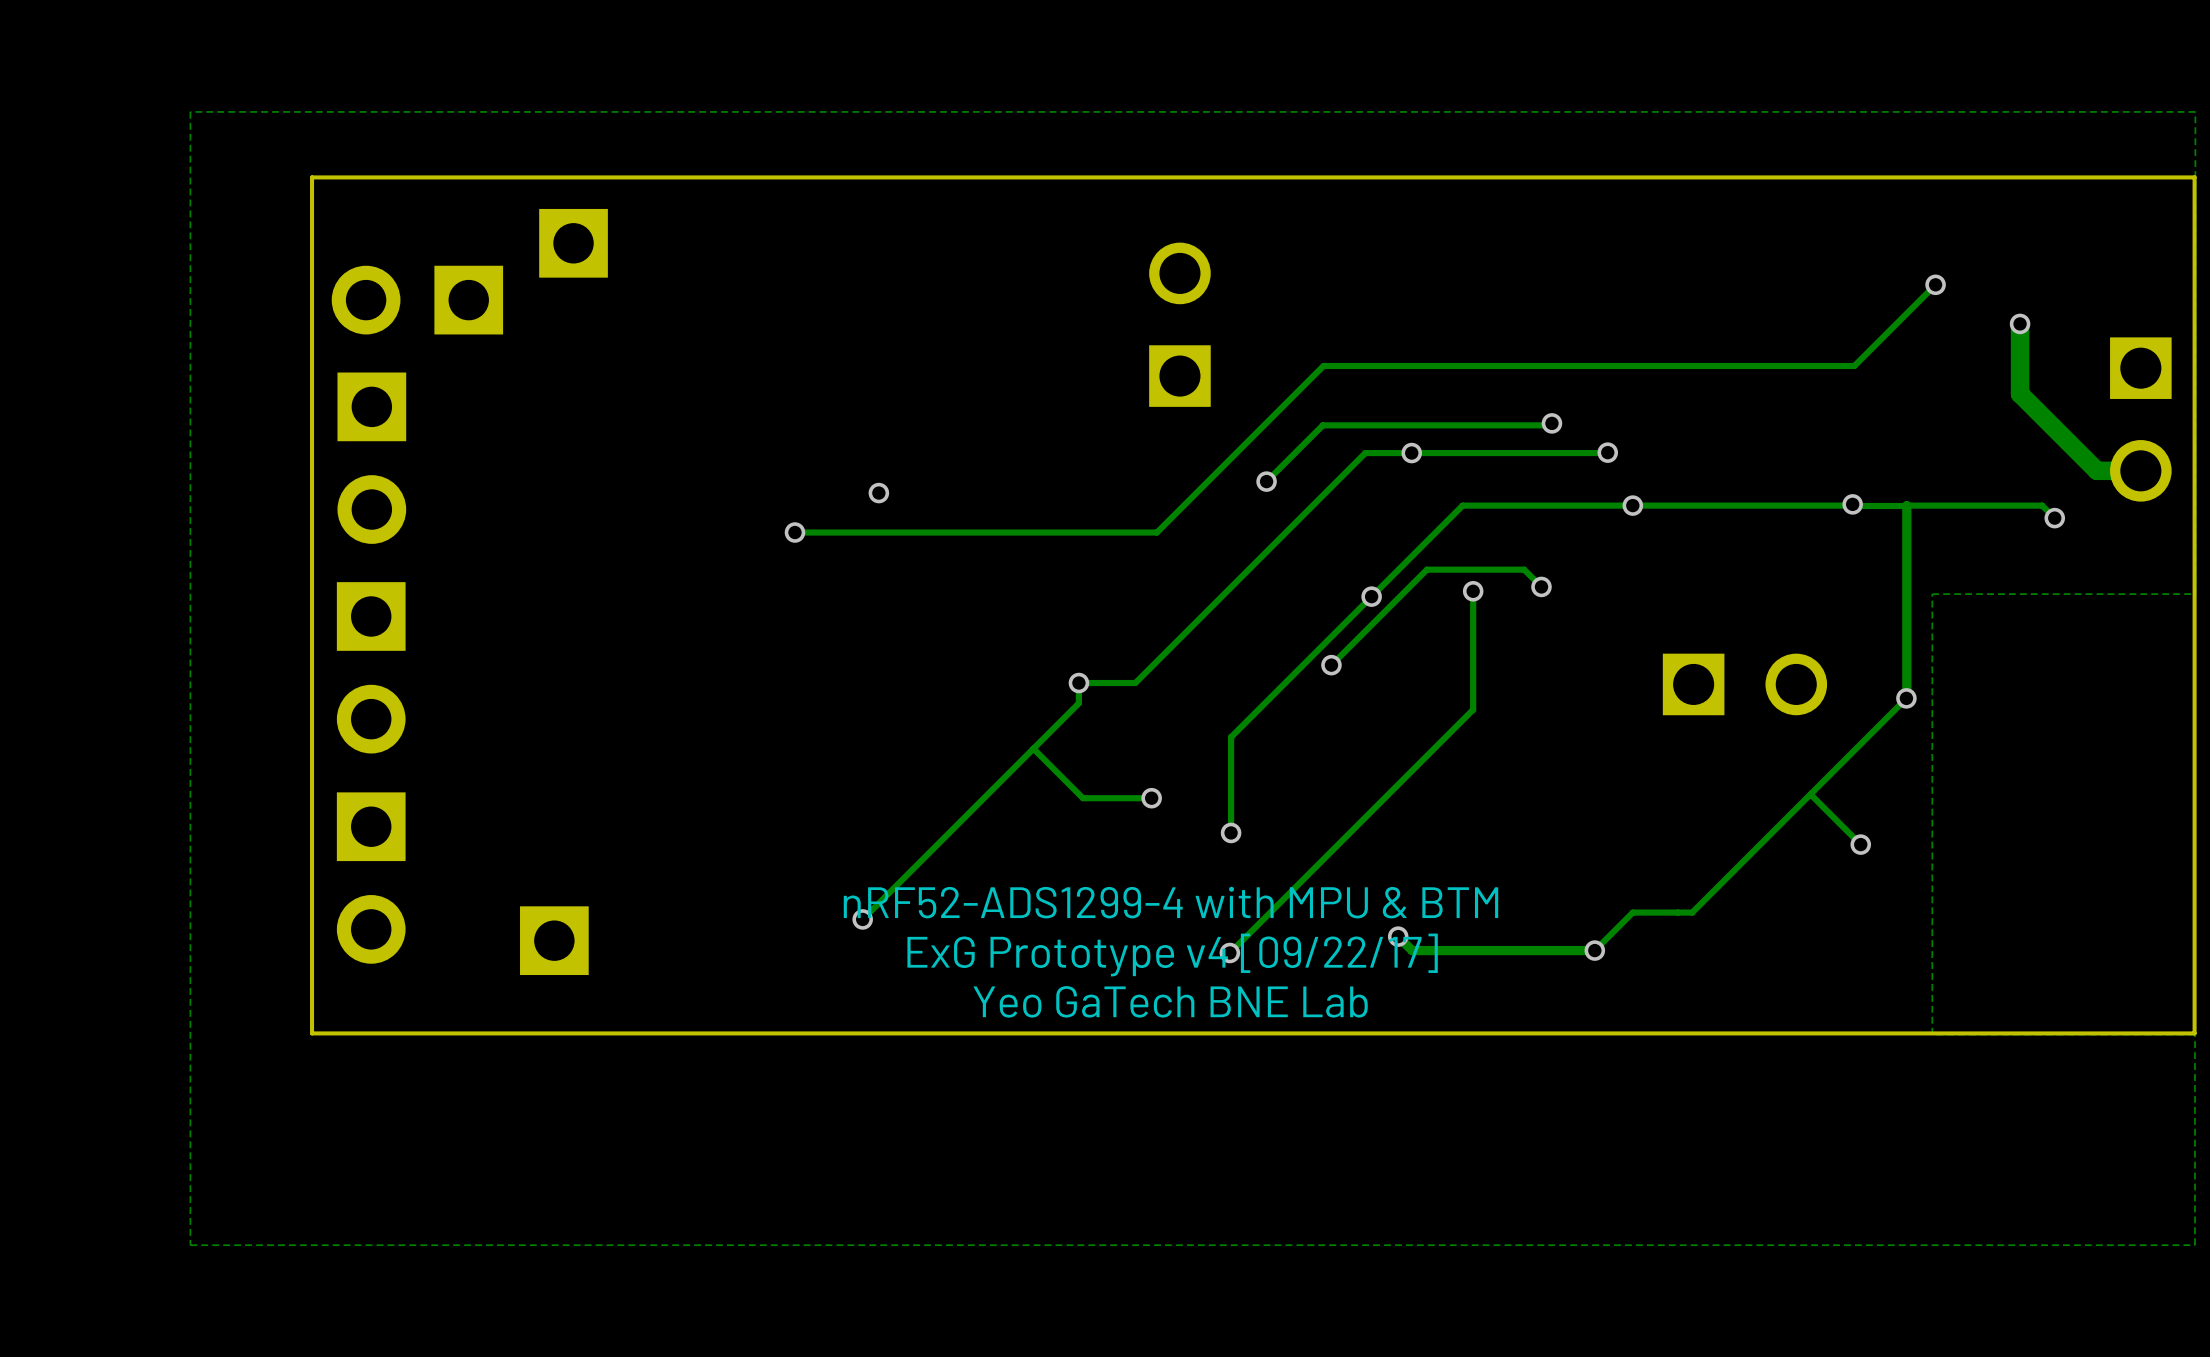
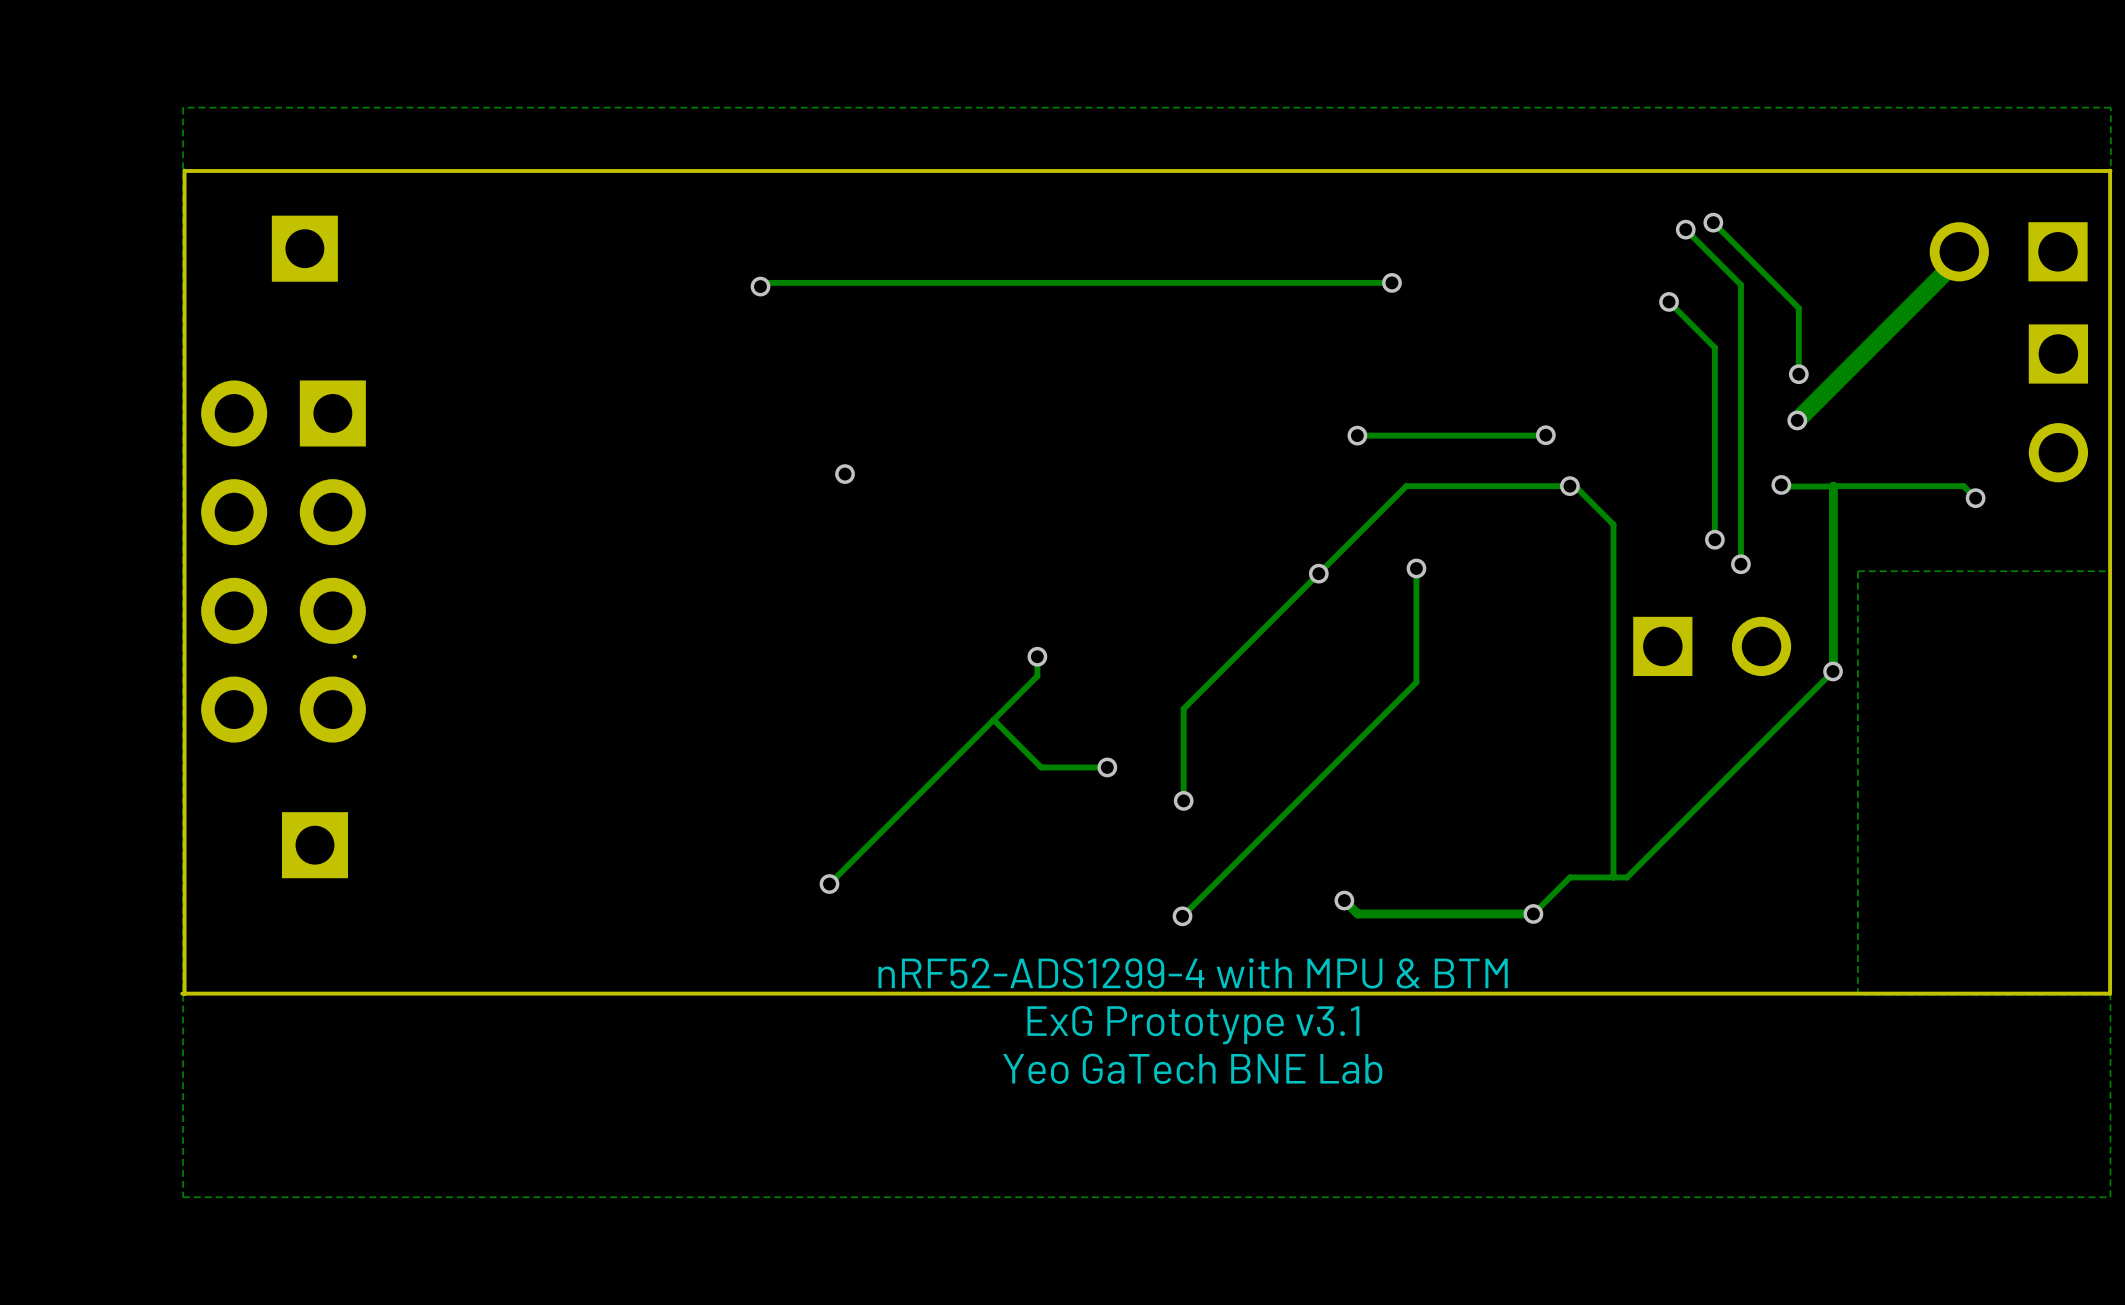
board edge: none -> (184, 170) (184, 993)
board edge: (2194, 177) (312, 177) (312, 1033) -> (2110, 170) (184, 170)
track: none -> (1713, 222) (1798, 308) (1798, 374)
via: none -> (1713, 222)
track: none -> (1685, 229) (1740, 284) (1740, 564)
via: none -> (1685, 229)
part position: (573, 243) -> (304, 248)
track: none -> (1959, 251) (1959, 258) (1797, 420)
track: (1935, 284) (1854, 366) (1323, 366) (1156, 532) (794, 532) -> none
via: (1935, 284) -> none
track: none -> (1391, 282) (764, 282) (760, 286)
via: none -> (1391, 282)
part: (417, 300) -> none
track: none -> (1669, 301) (1714, 347) (1714, 539)
via: none -> (1669, 301)
track: (2020, 323) (2020, 393) (2096, 470) (2140, 470) -> none
via: (2020, 323) -> none
part rotation: 0° (1179, 324) -> 90° counterclockwise (2008, 251)
part position: (1179, 324) -> (2008, 251)
via: none -> (1798, 374)
track: (1551, 423) (1550, 425) (1322, 425) (1266, 481) -> none
via: (1551, 423) -> none
via: none -> (1797, 420)
track: (1411, 453) (1365, 453) (1135, 683) (1078, 683) -> none
part: (371, 458) -> none
via: (1266, 481) -> none
track: (1852, 504) (1638, 505) -> (1613, 877) (1613, 524) (1575, 486)
via position: (794, 532) -> (760, 286)
via: none -> (1714, 539)
part: none -> (283, 561)
track: (1541, 586) (1524, 569) (1426, 569) (1331, 665) -> none
via: (1541, 586) -> none
via: none -> (1740, 564)
via: (1331, 665) -> none
part: (371, 667) -> none
board edge: none -> (355, 656) (354, 656)
part position: (1744, 684) -> (1712, 646)
track: (1811, 793) (1811, 795) (1860, 844) -> none
via: (1860, 844) -> none
part: (371, 878) -> none
text position: nRF52-ADS1299-4 with MPU & BTM (1170, 902) -> nRF52-ADS1299-4 with MPU & BTM (1193, 973)
part position: (554, 940) -> (314, 845)
text: ExG Prototype v4 [09/22/17] (1172, 955) -> none
text position: Yeo GaTech BNE Lab (1170, 1001) -> Yeo GaTech BNE Lab (1192, 1068)
board edge: none -> (300, 993) (182, 993)
text: none -> ExG Prototype v3.1 (1193, 1025)

